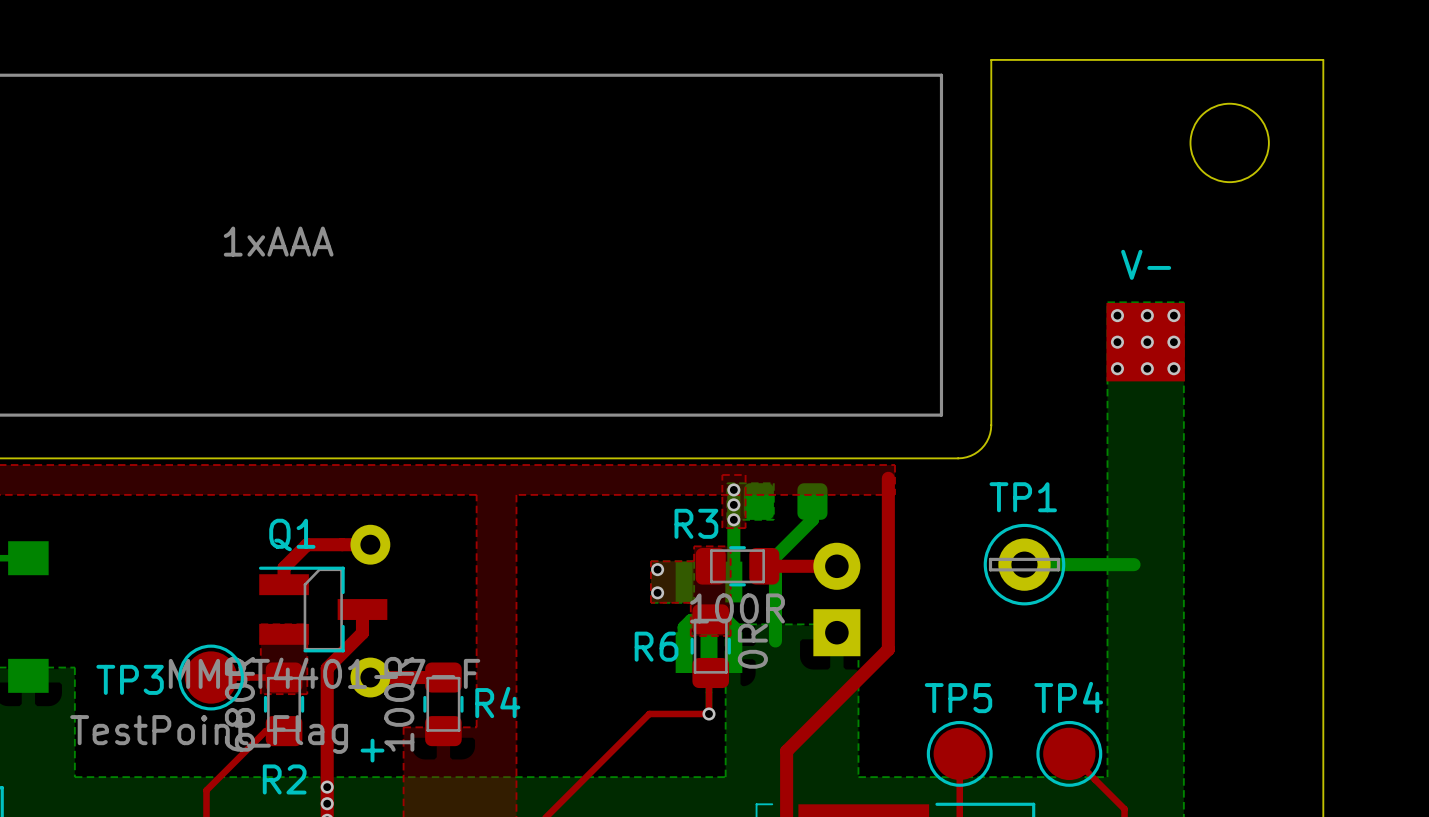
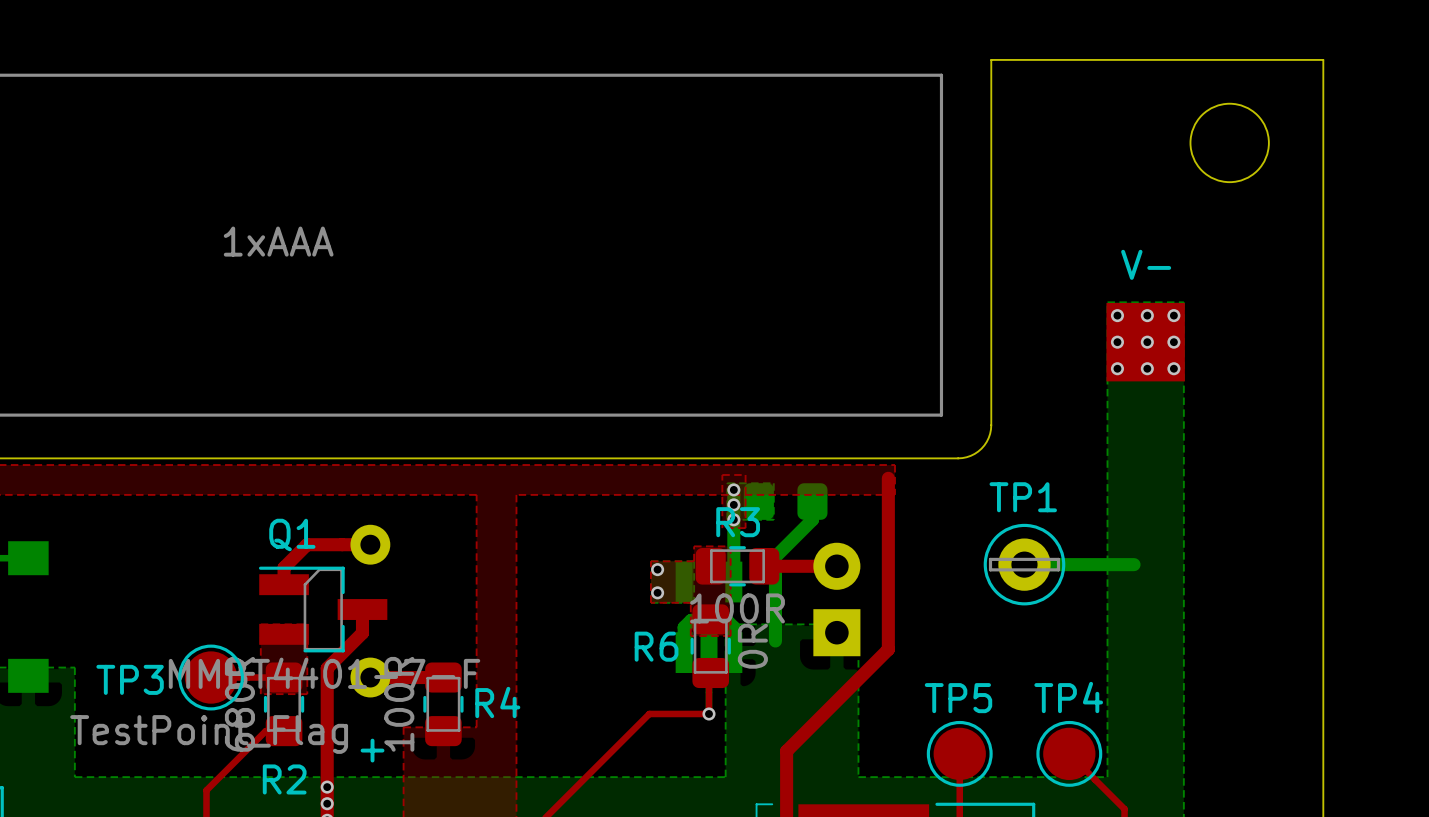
R3 name position: R3 (696, 523) -> R3 (738, 522)

